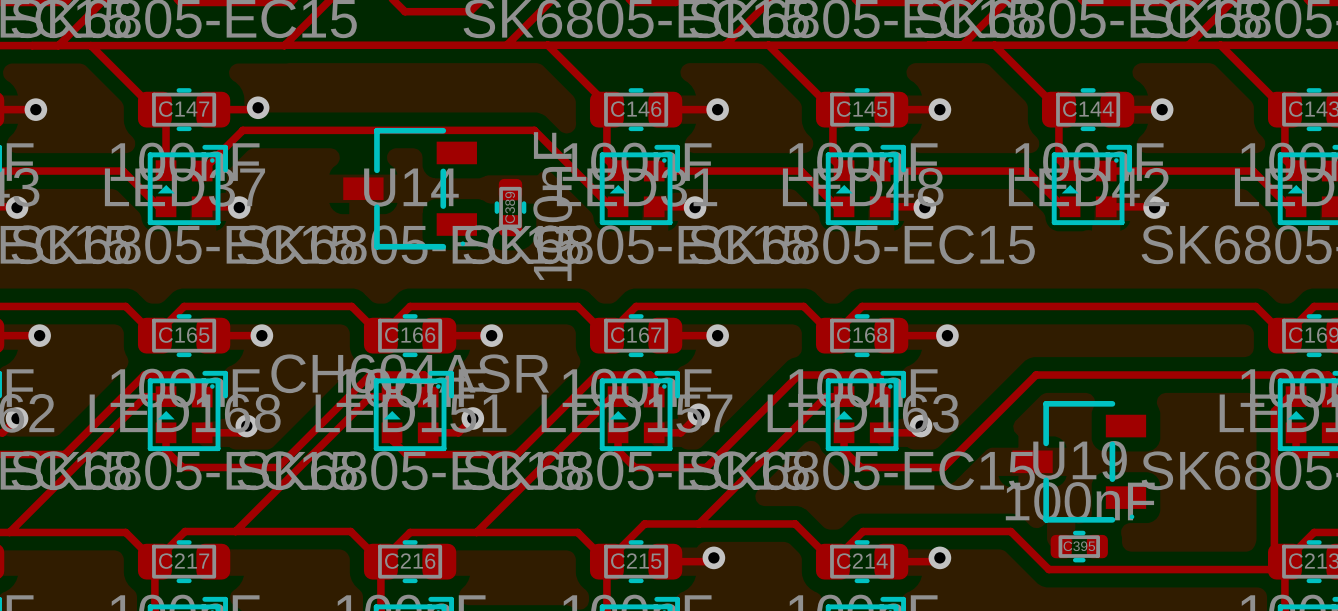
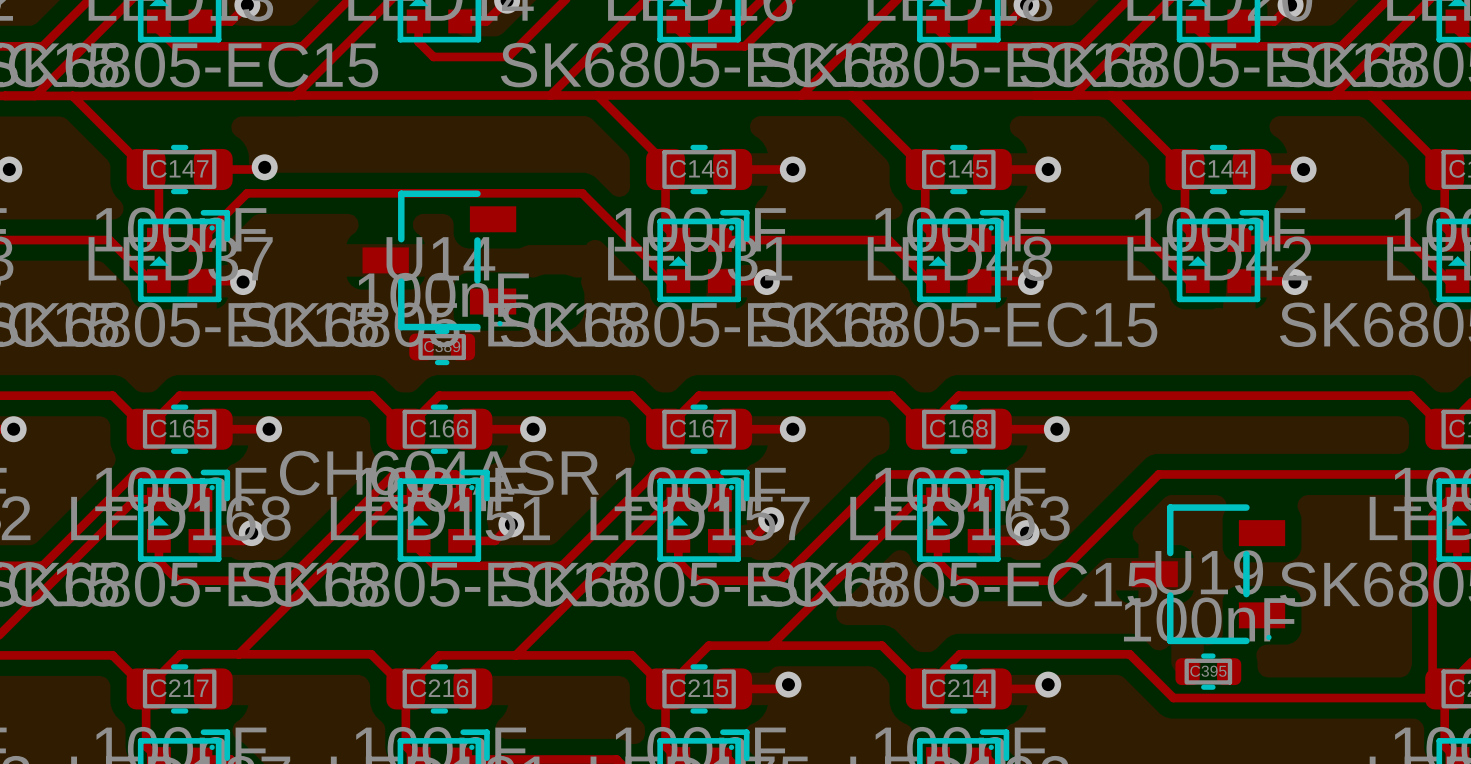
C389 rotation: 0° (510, 207) -> 90° clockwise (442, 346)
C389 position: (510, 207) -> (442, 346)

